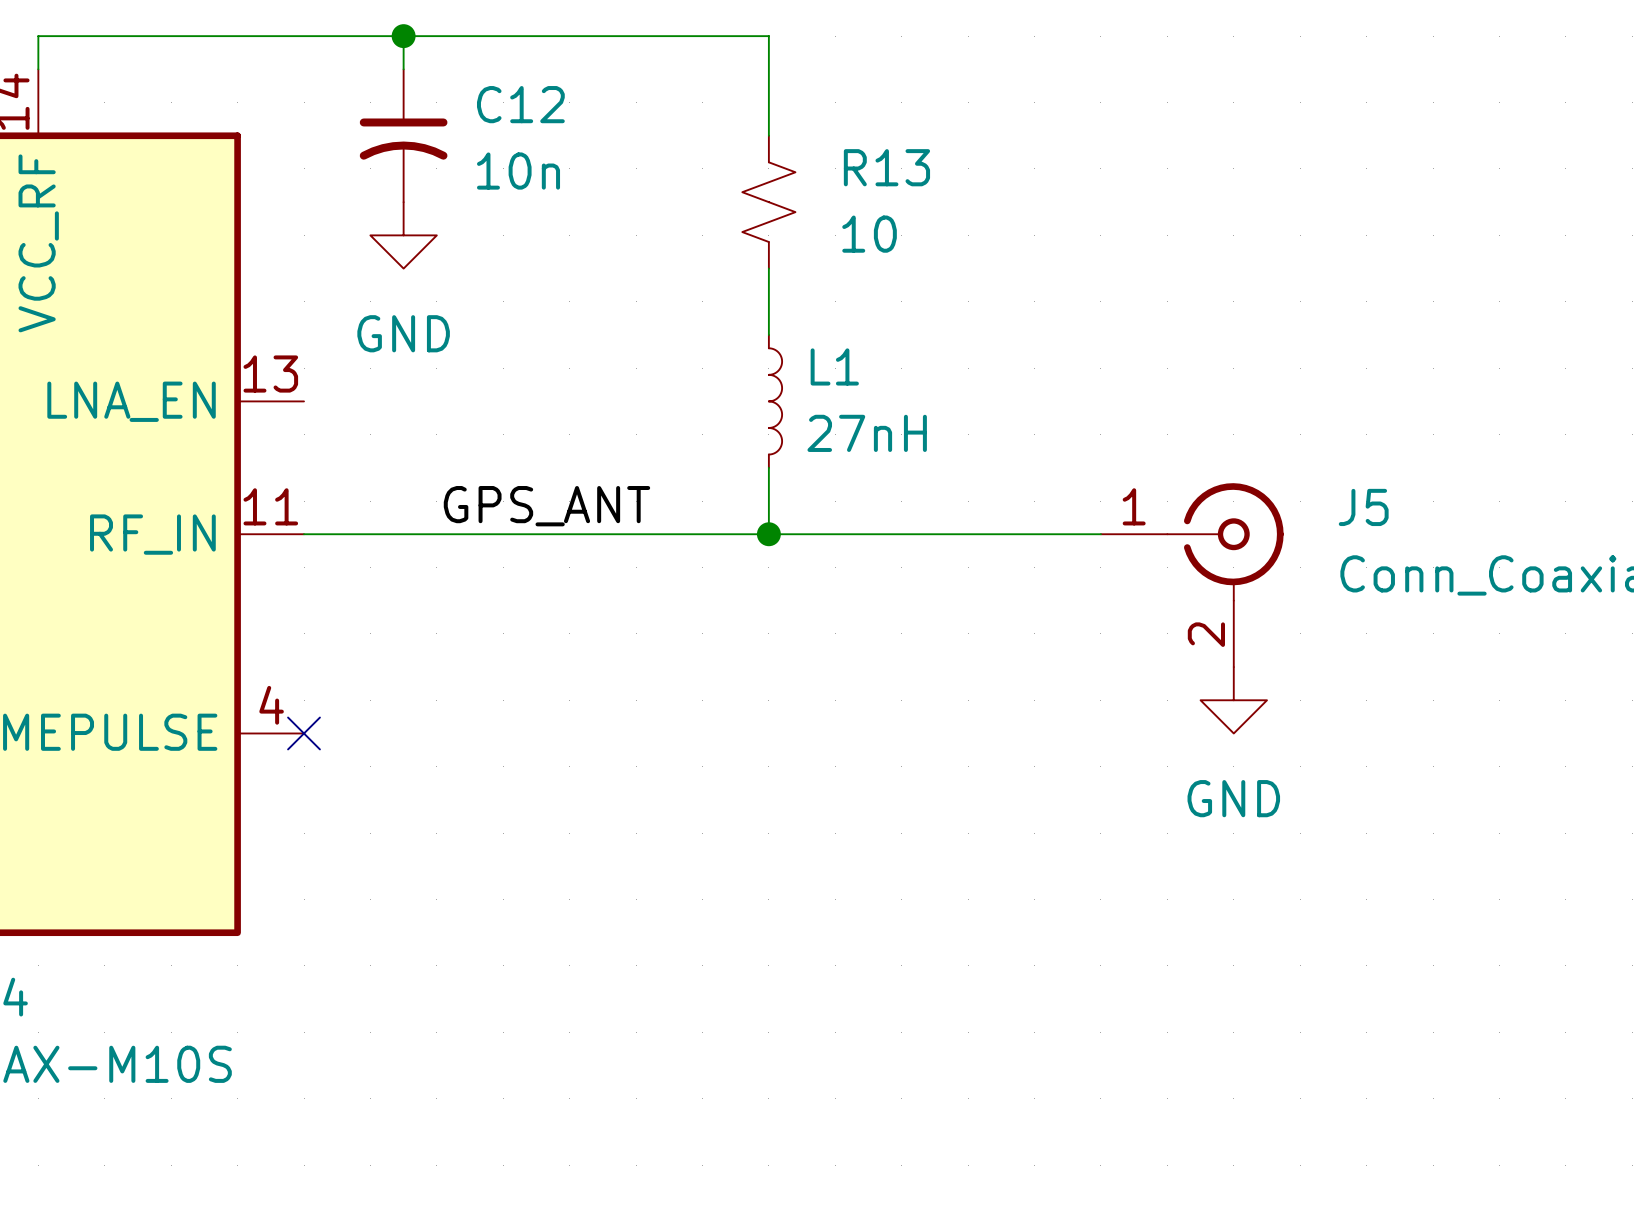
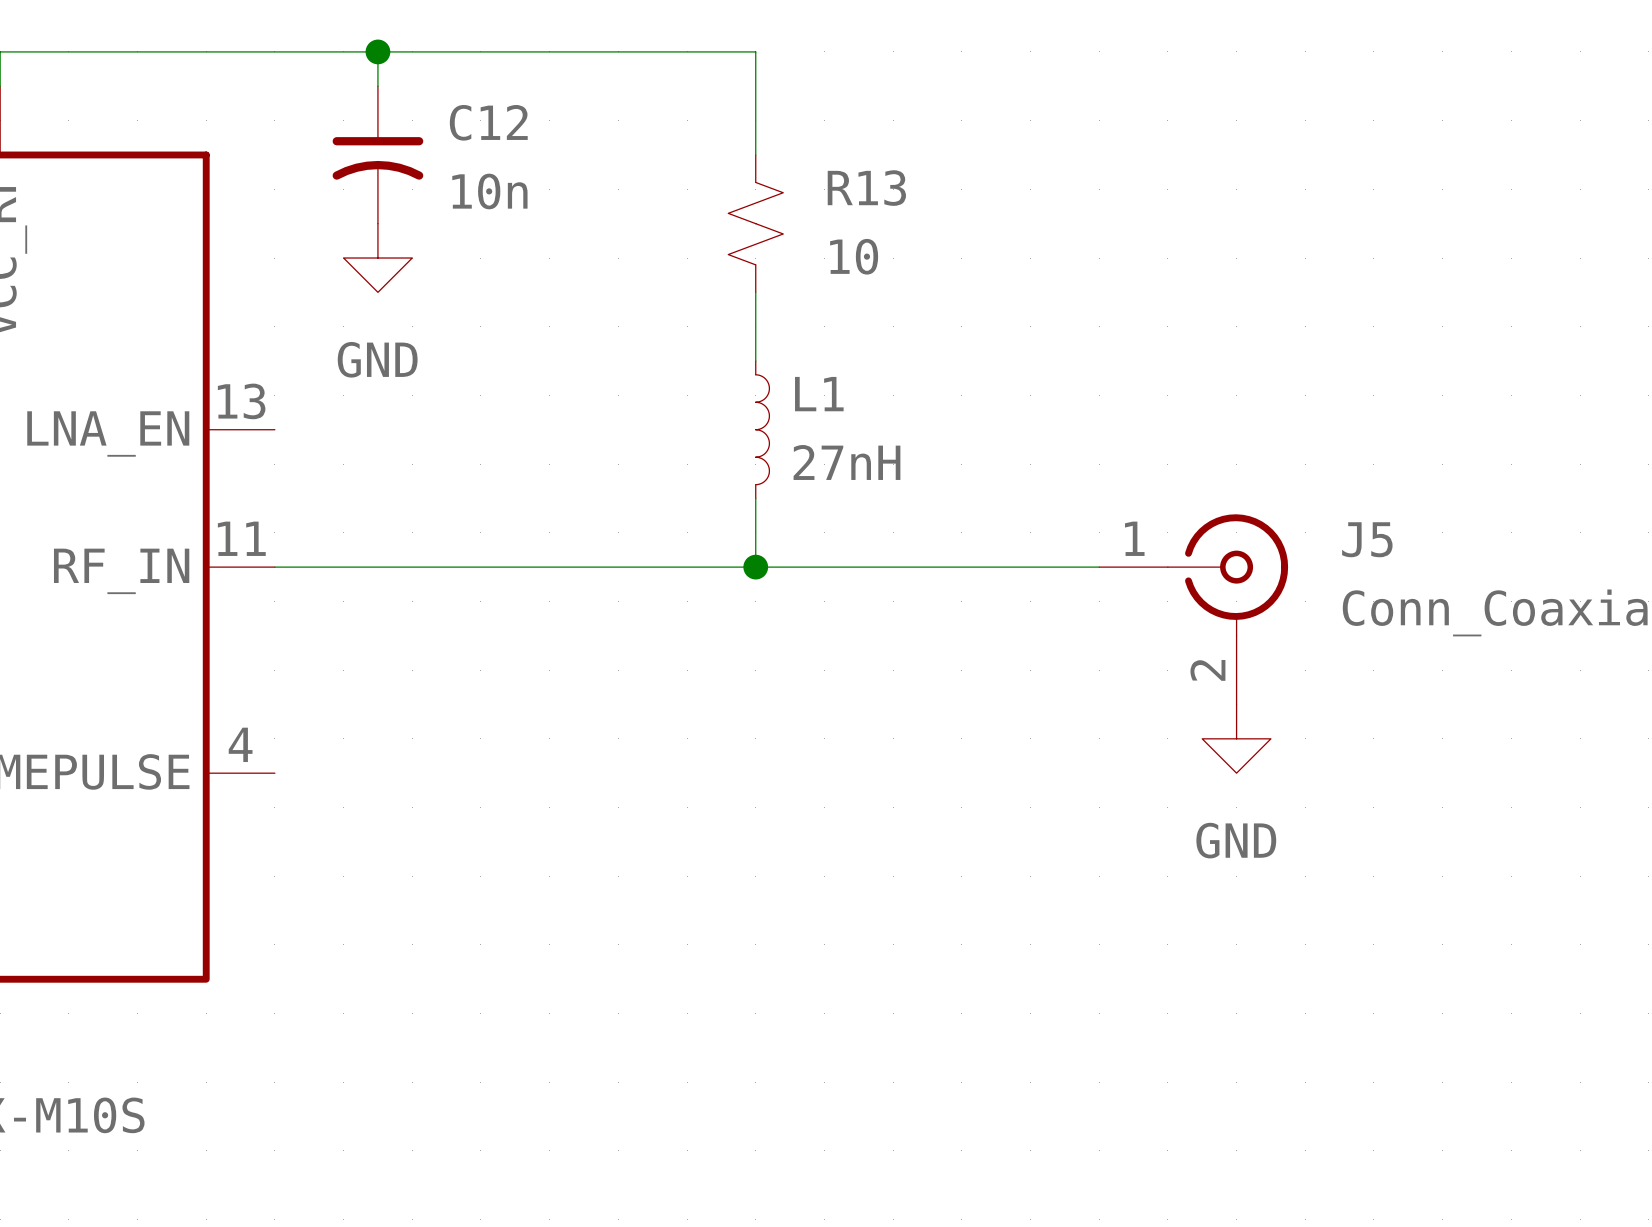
label: GPS_ANT (546, 506) -> none
no-connect mark: (304, 733) -> none

